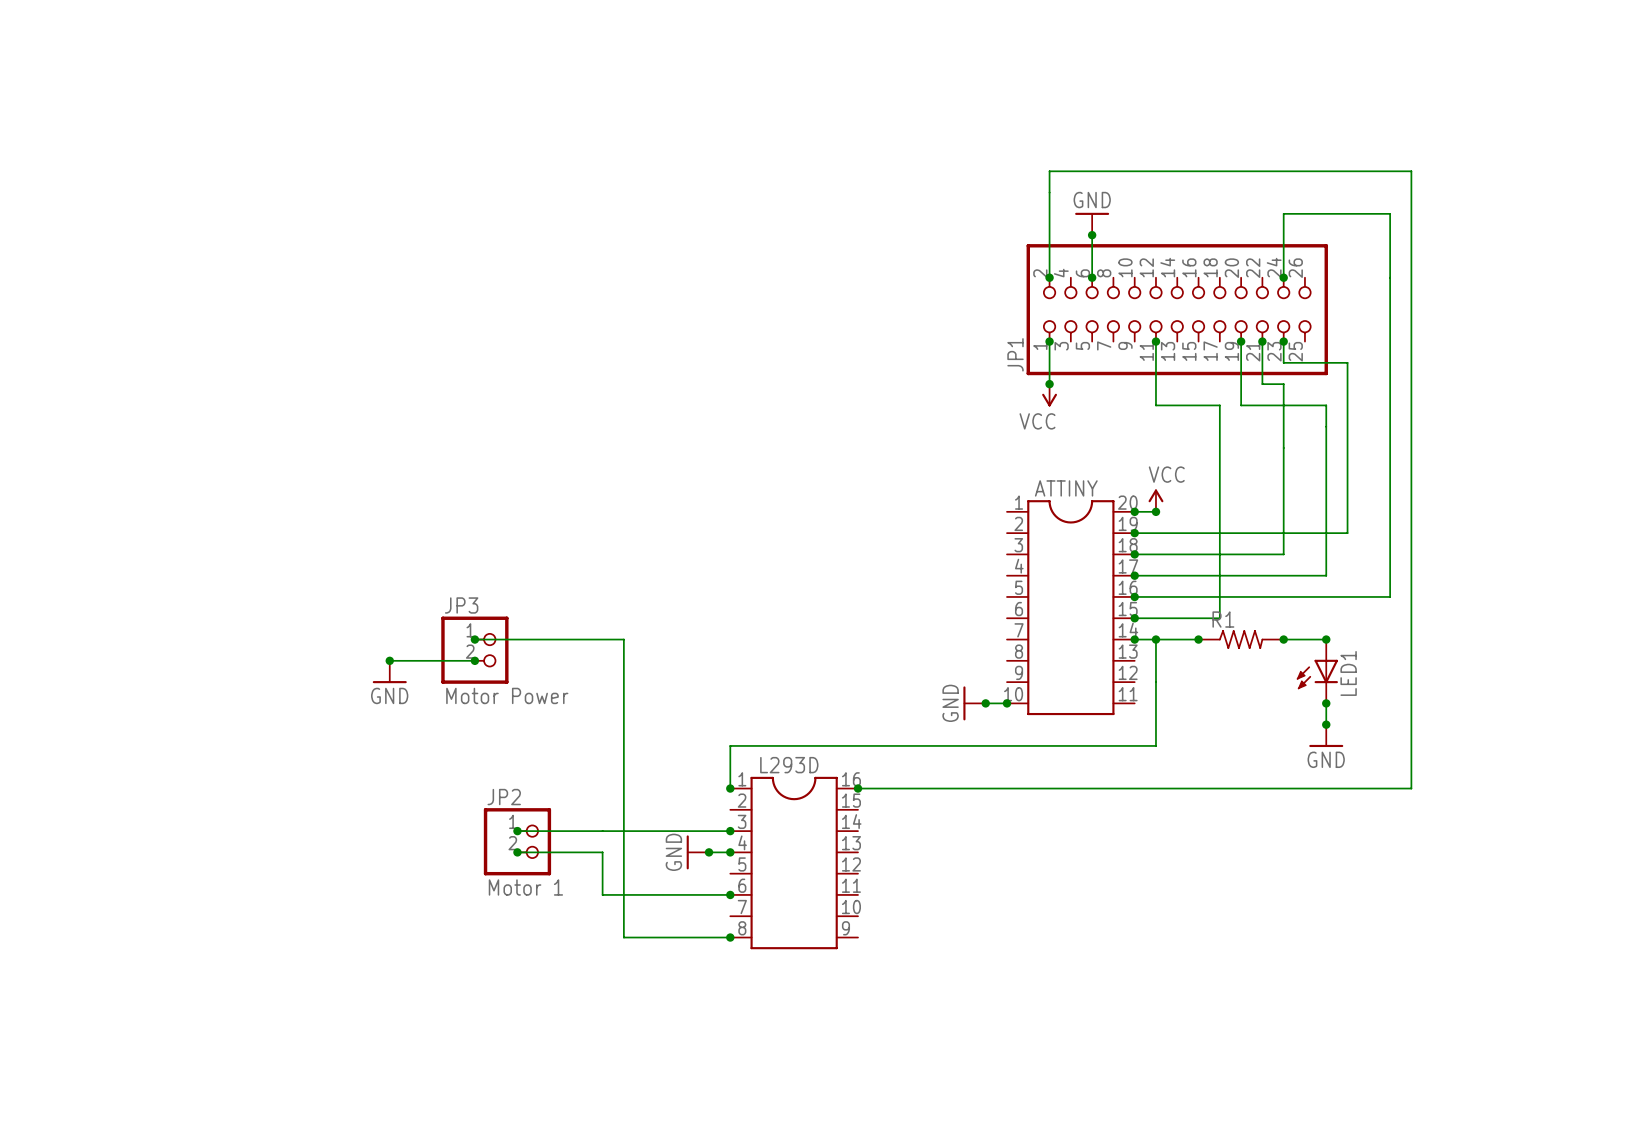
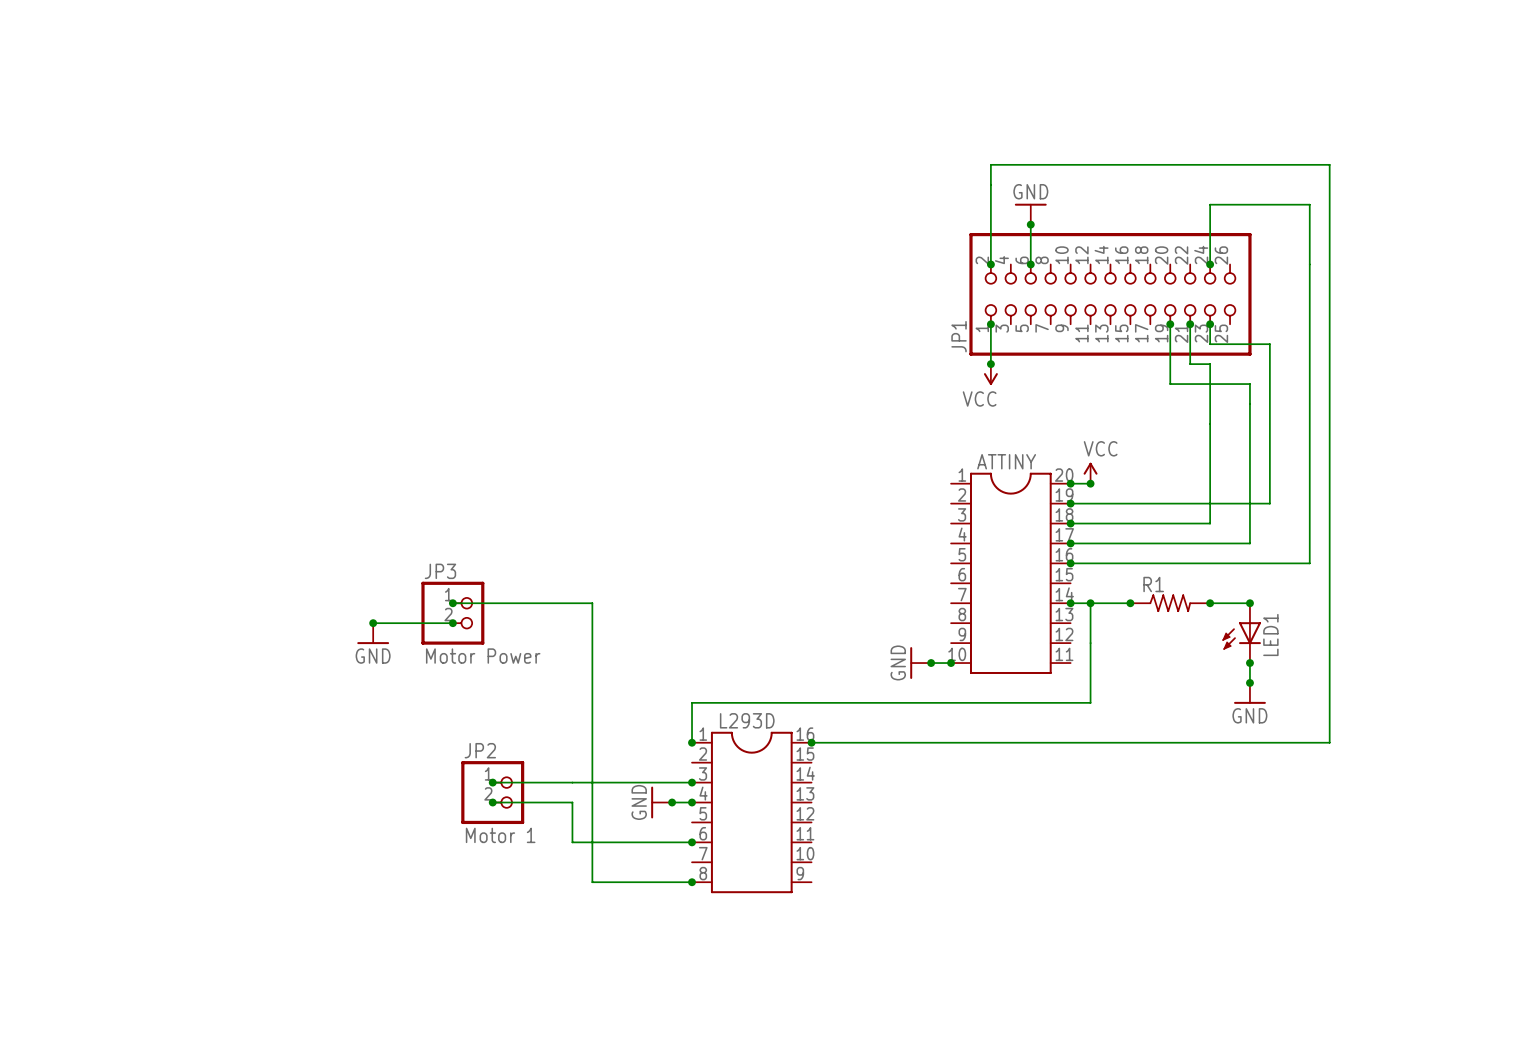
wire: (1155, 341) (1155, 405) (1219, 405) (1219, 618) (1134, 618) -> none
junction: (1155, 341) -> none
junction: (1134, 618) -> none

